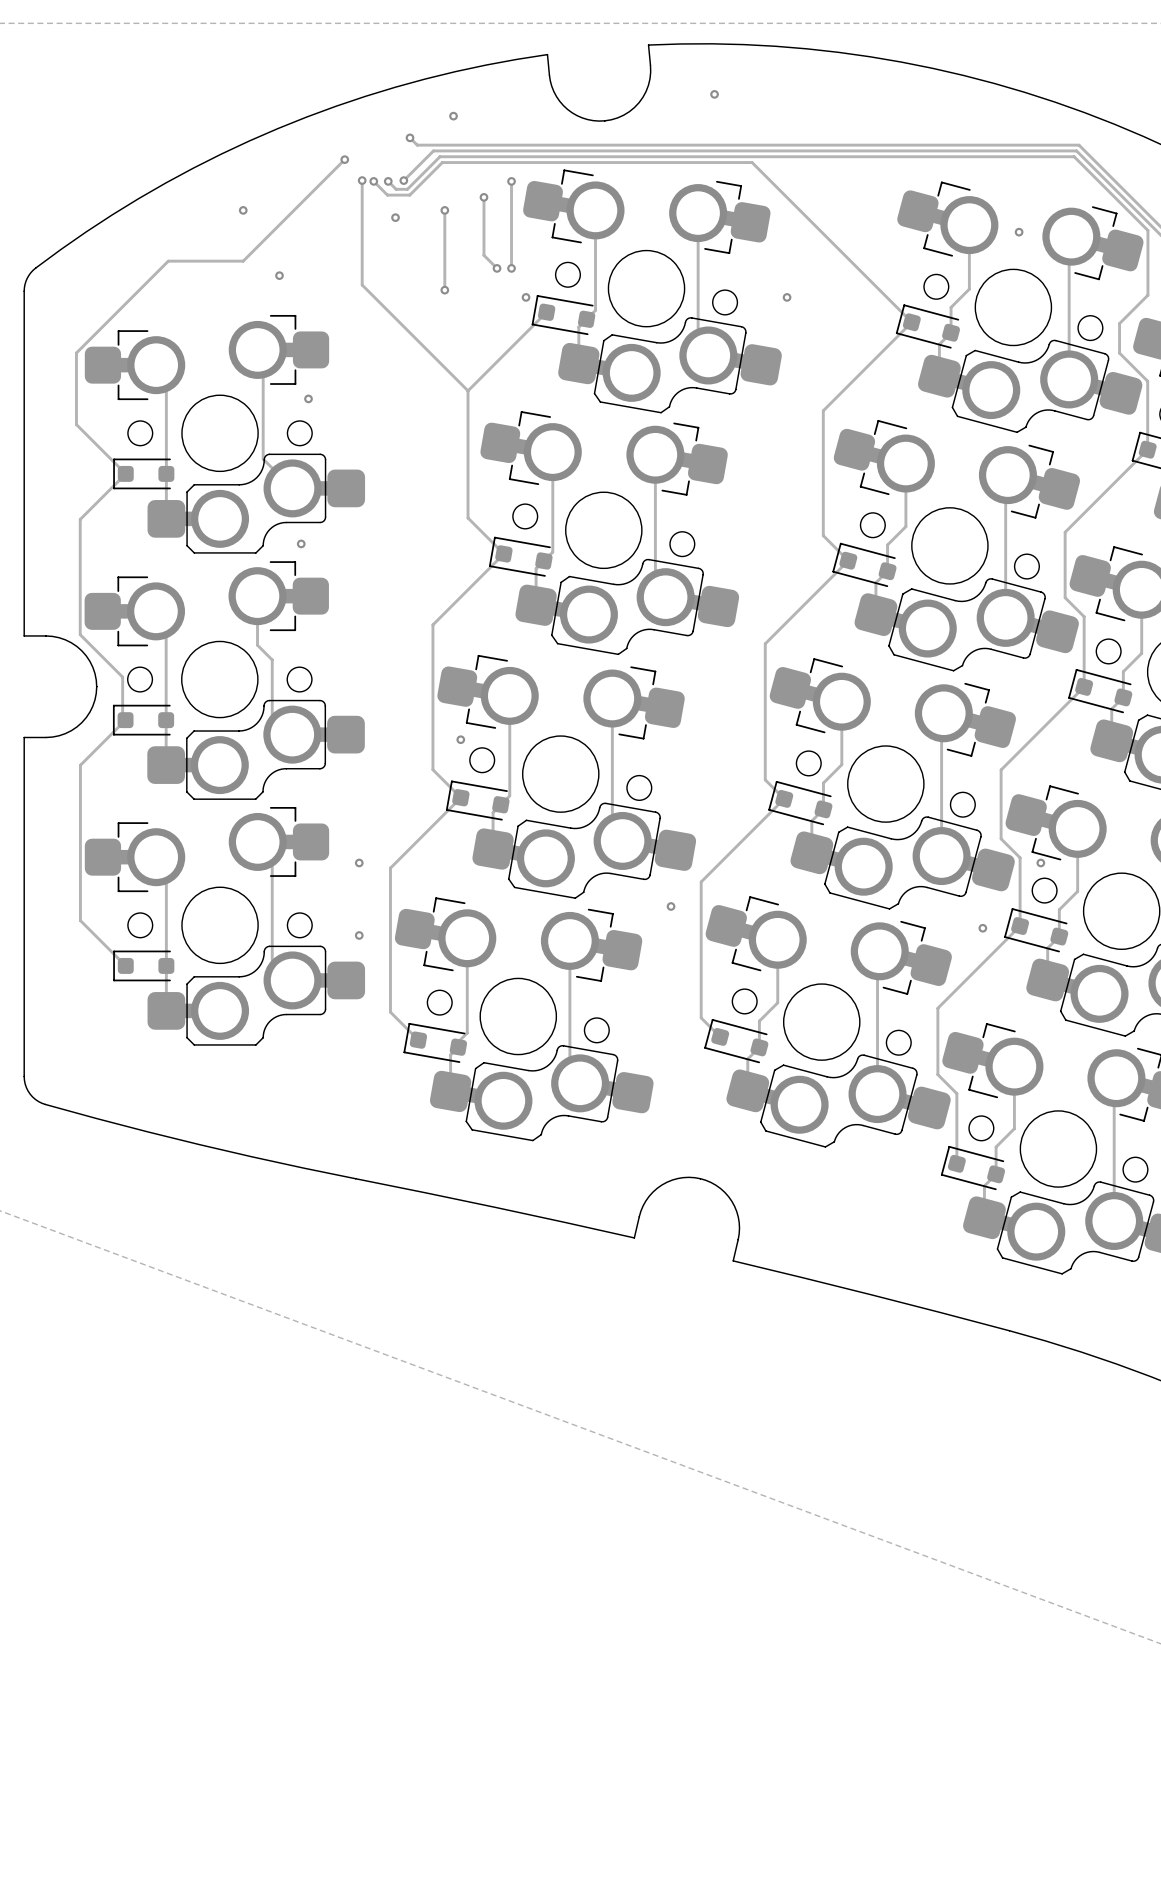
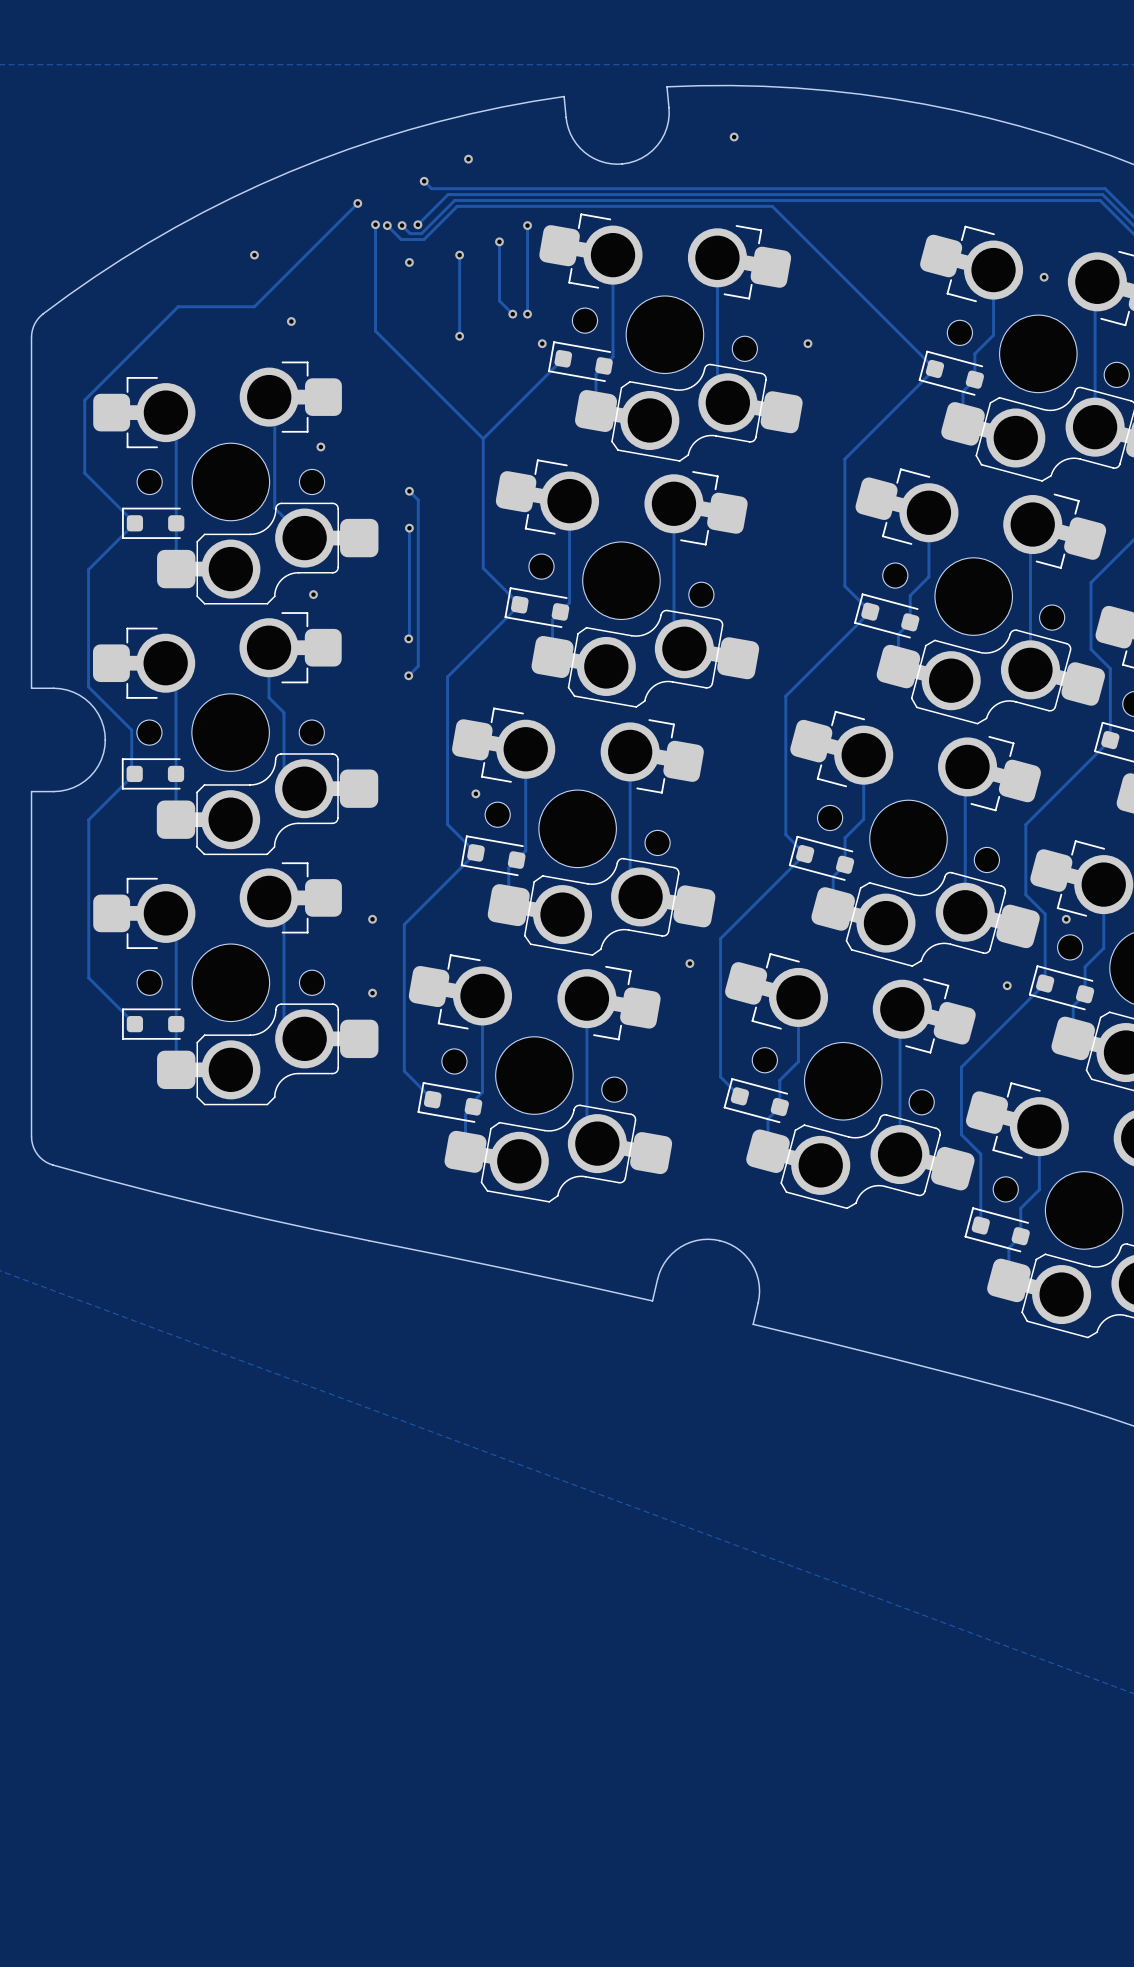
track: none -> (409, 491) (418, 500) (418, 666) (408, 675)
via: none -> (409, 491)
track: none -> (409, 528) (408, 638)
via: none -> (409, 528)
via: none -> (408, 638)
via: none -> (408, 675)

